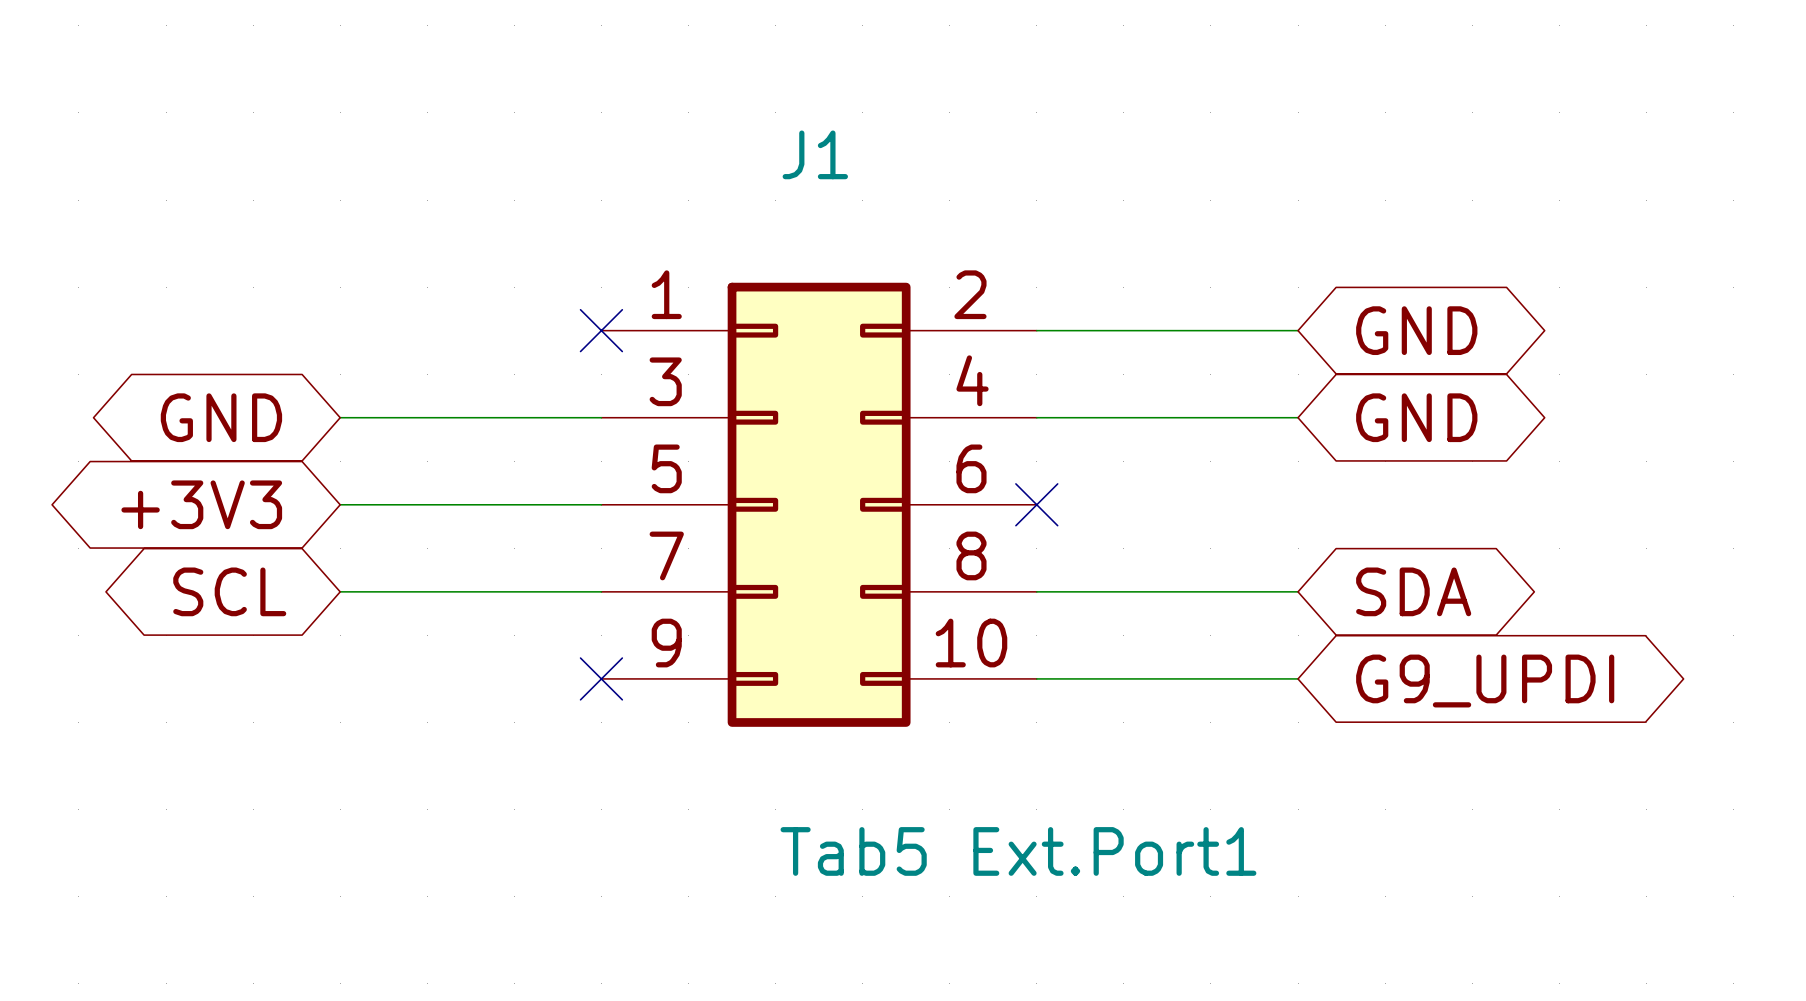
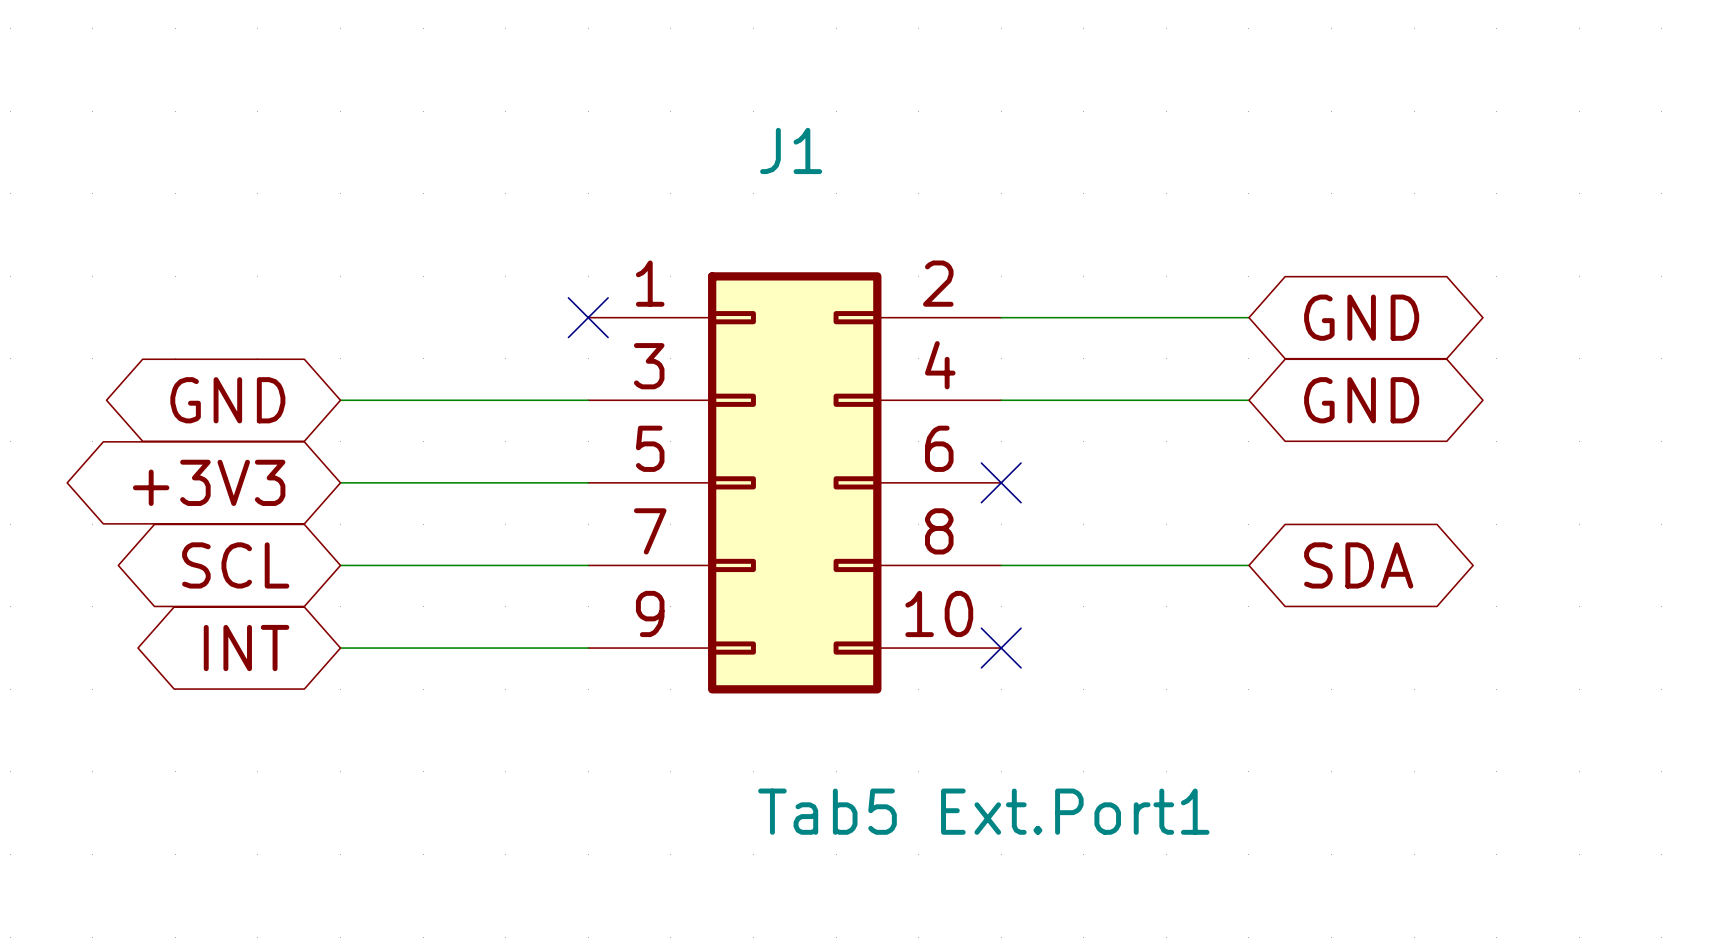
global label: none -> INT (246, 648)
no-connect mark: (601, 678) -> none
wire: (1036, 678) (1298, 678) -> (340, 648) (588, 648)
no-connect mark: none -> (1001, 648)
global label: G9_UPDI (1485, 681) -> none

